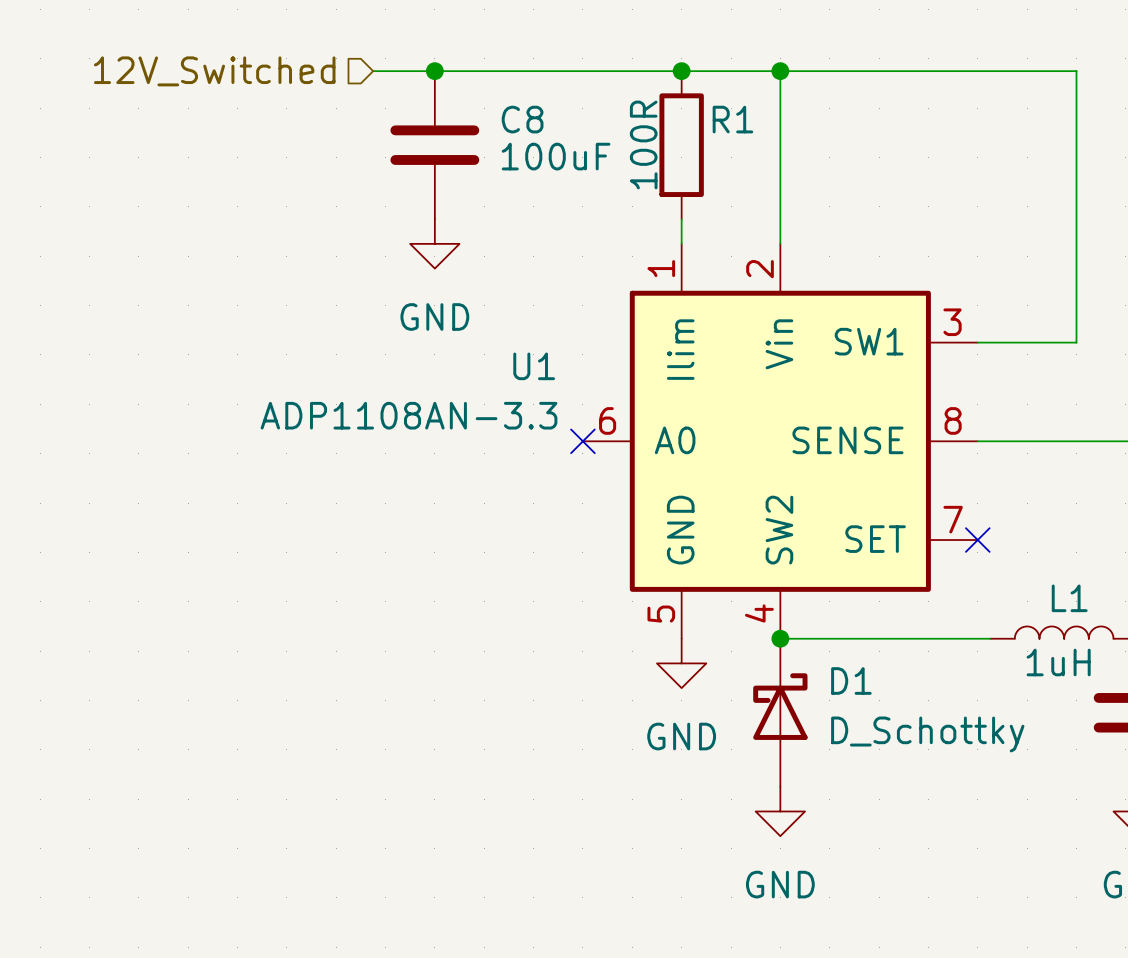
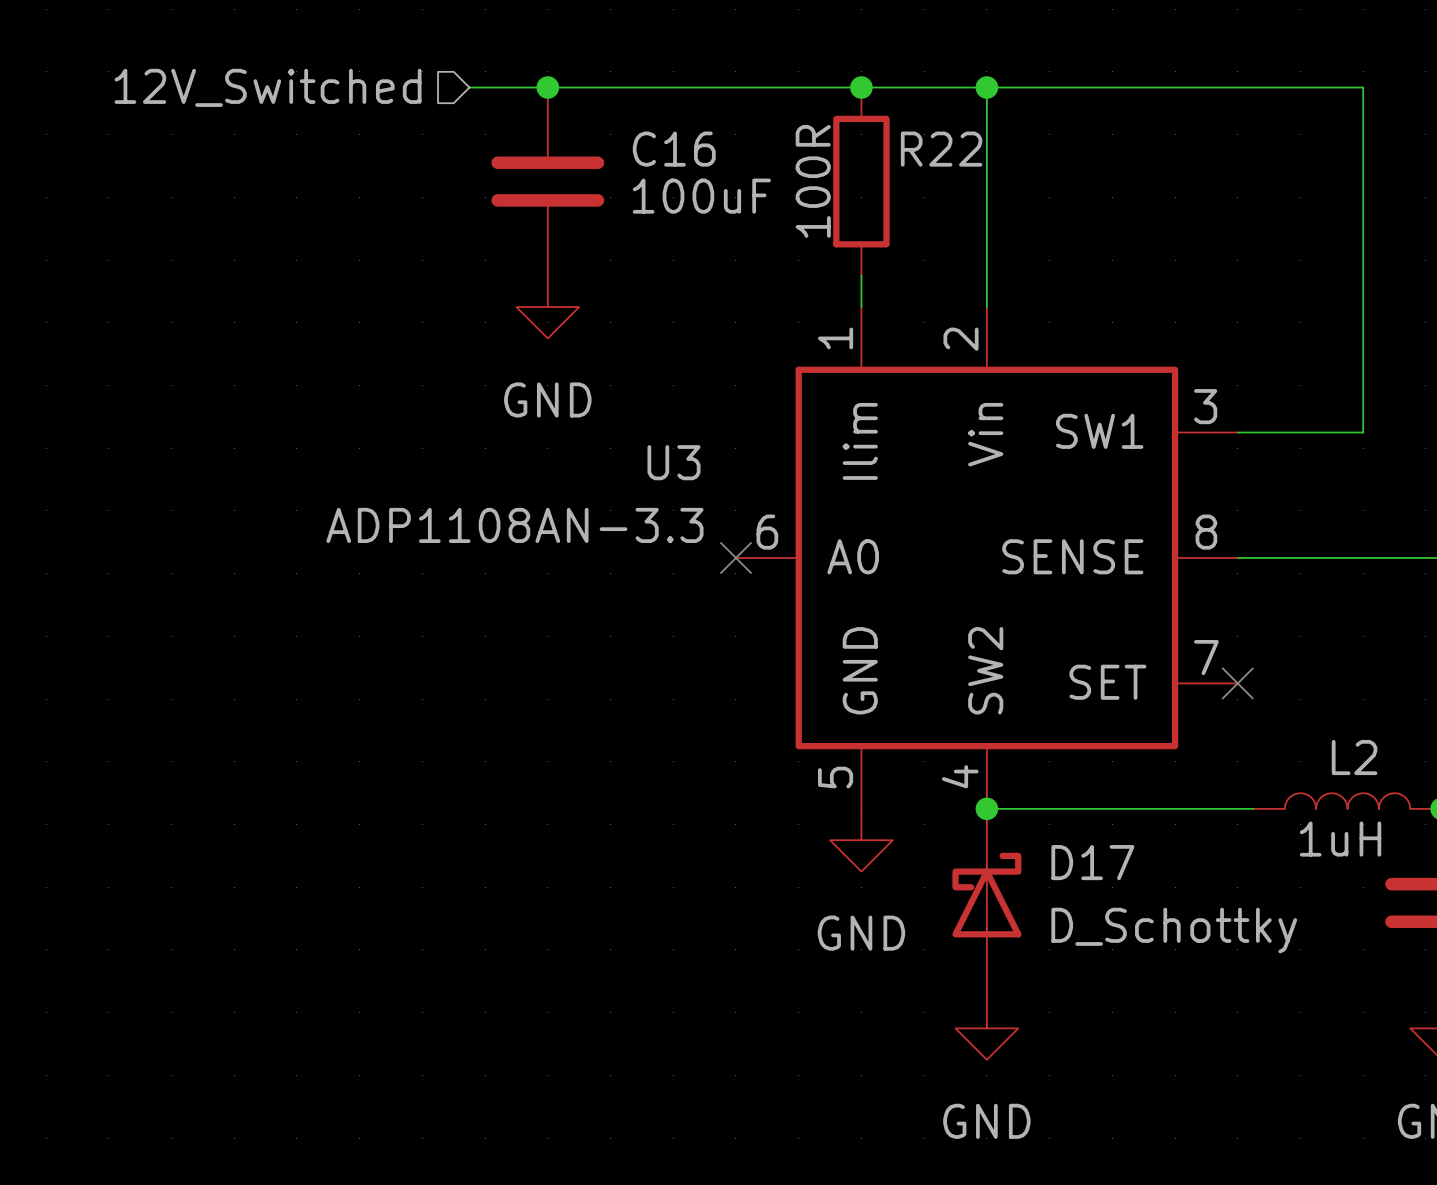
C8 name: C8 (522, 119) -> C16 (674, 149)
R1 name: R1 (732, 119) -> R22 (941, 149)
U1 name: U1 (534, 366) -> U3 (674, 462)
L1 name: L1 (1069, 598) -> L2 (1354, 757)
D1 name: D1 (851, 681) -> D17 (1092, 862)

